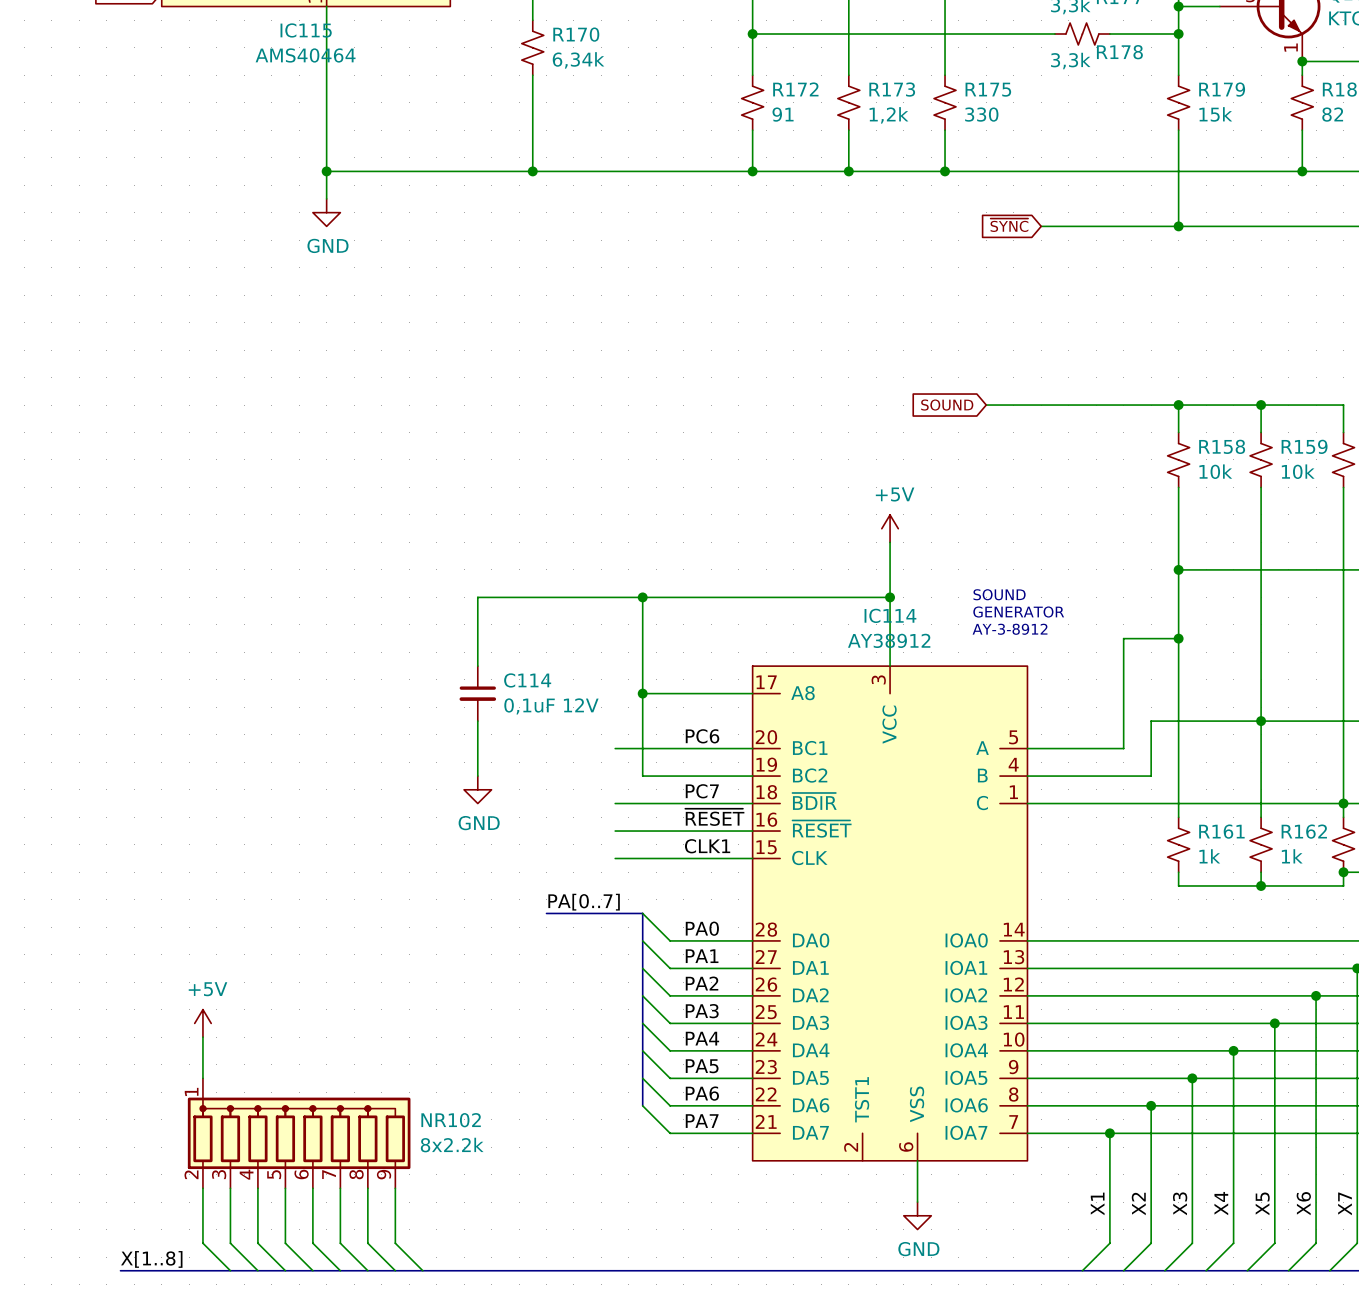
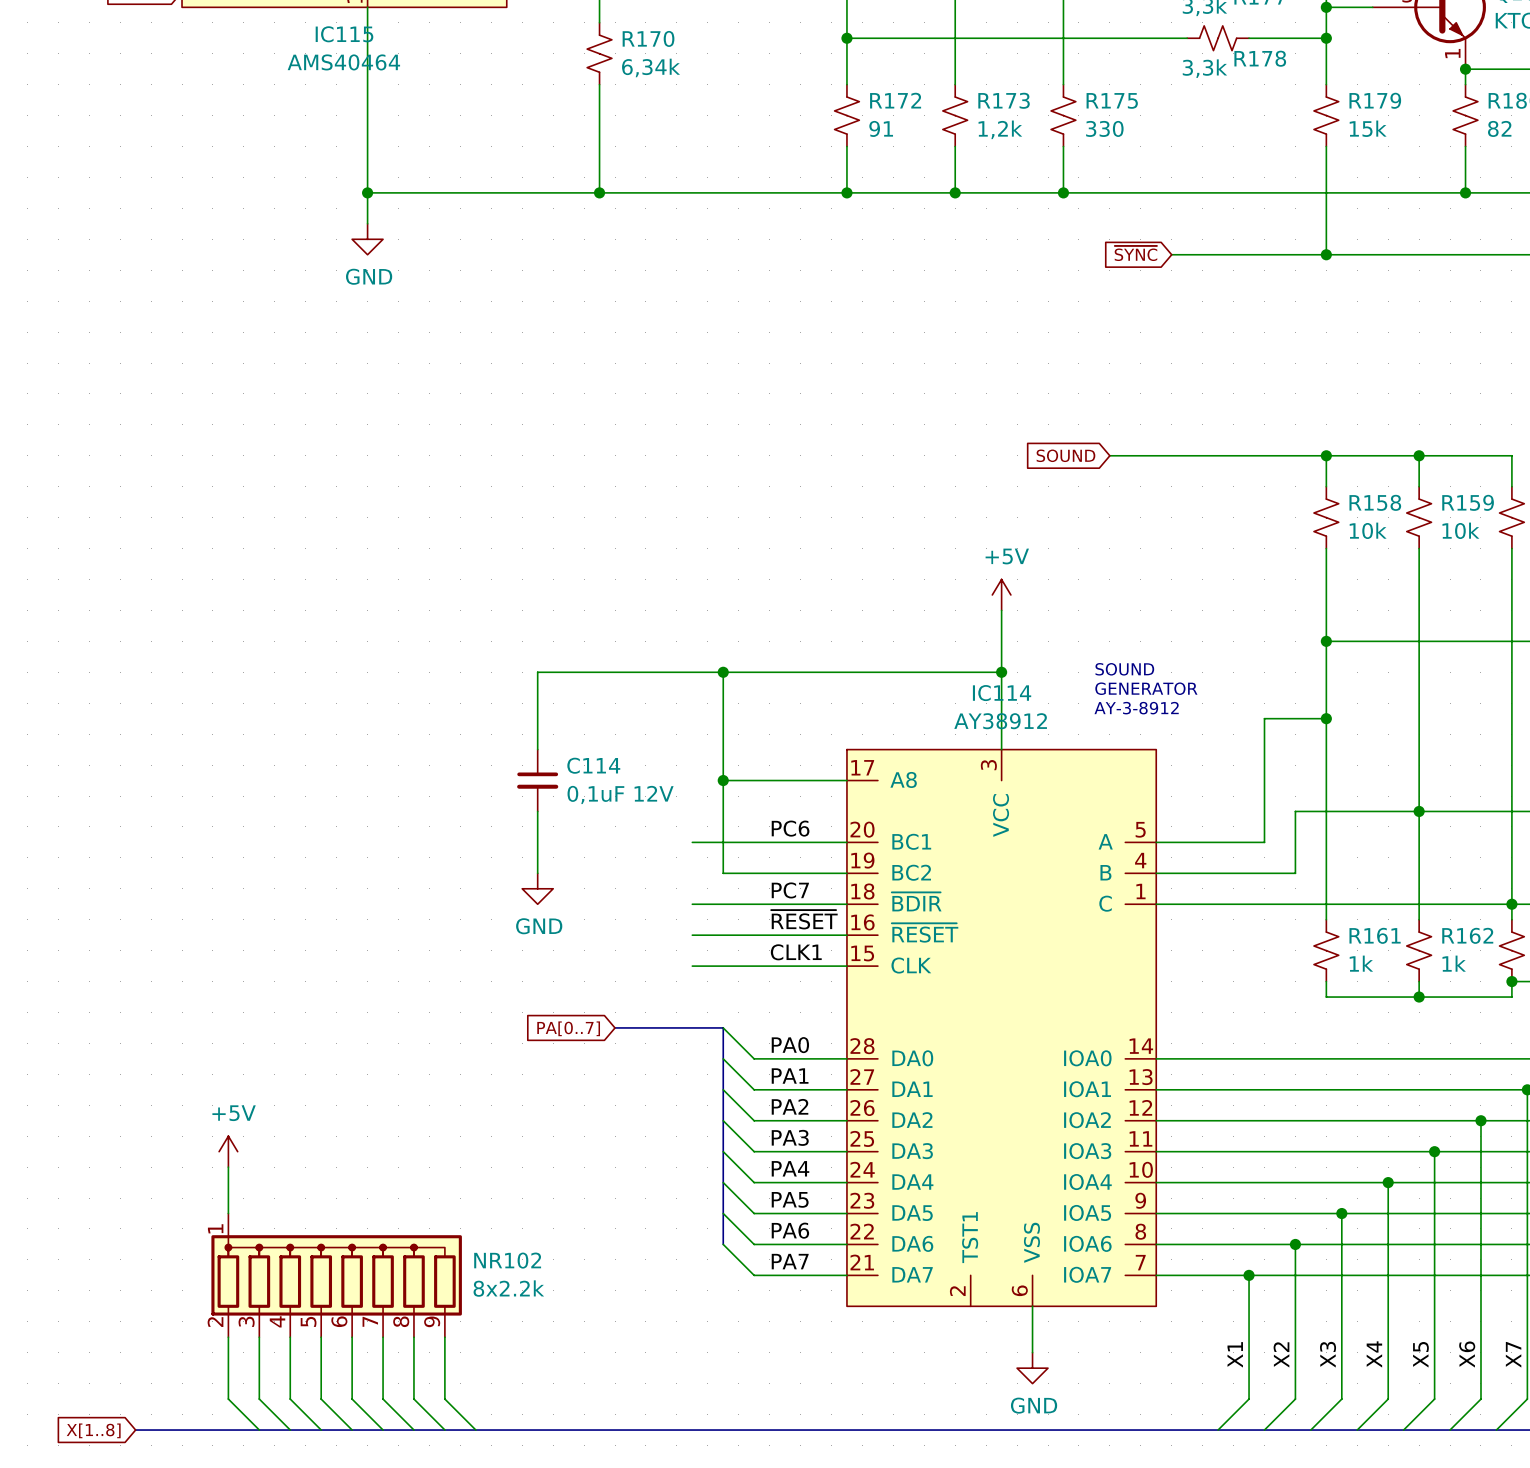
label: PA[0..7] (584, 902) -> none
global label: none -> PA[0..7] (568, 1028)
label: X[1..8] (151, 1259) -> none
global label: none -> X[1..8] (93, 1430)

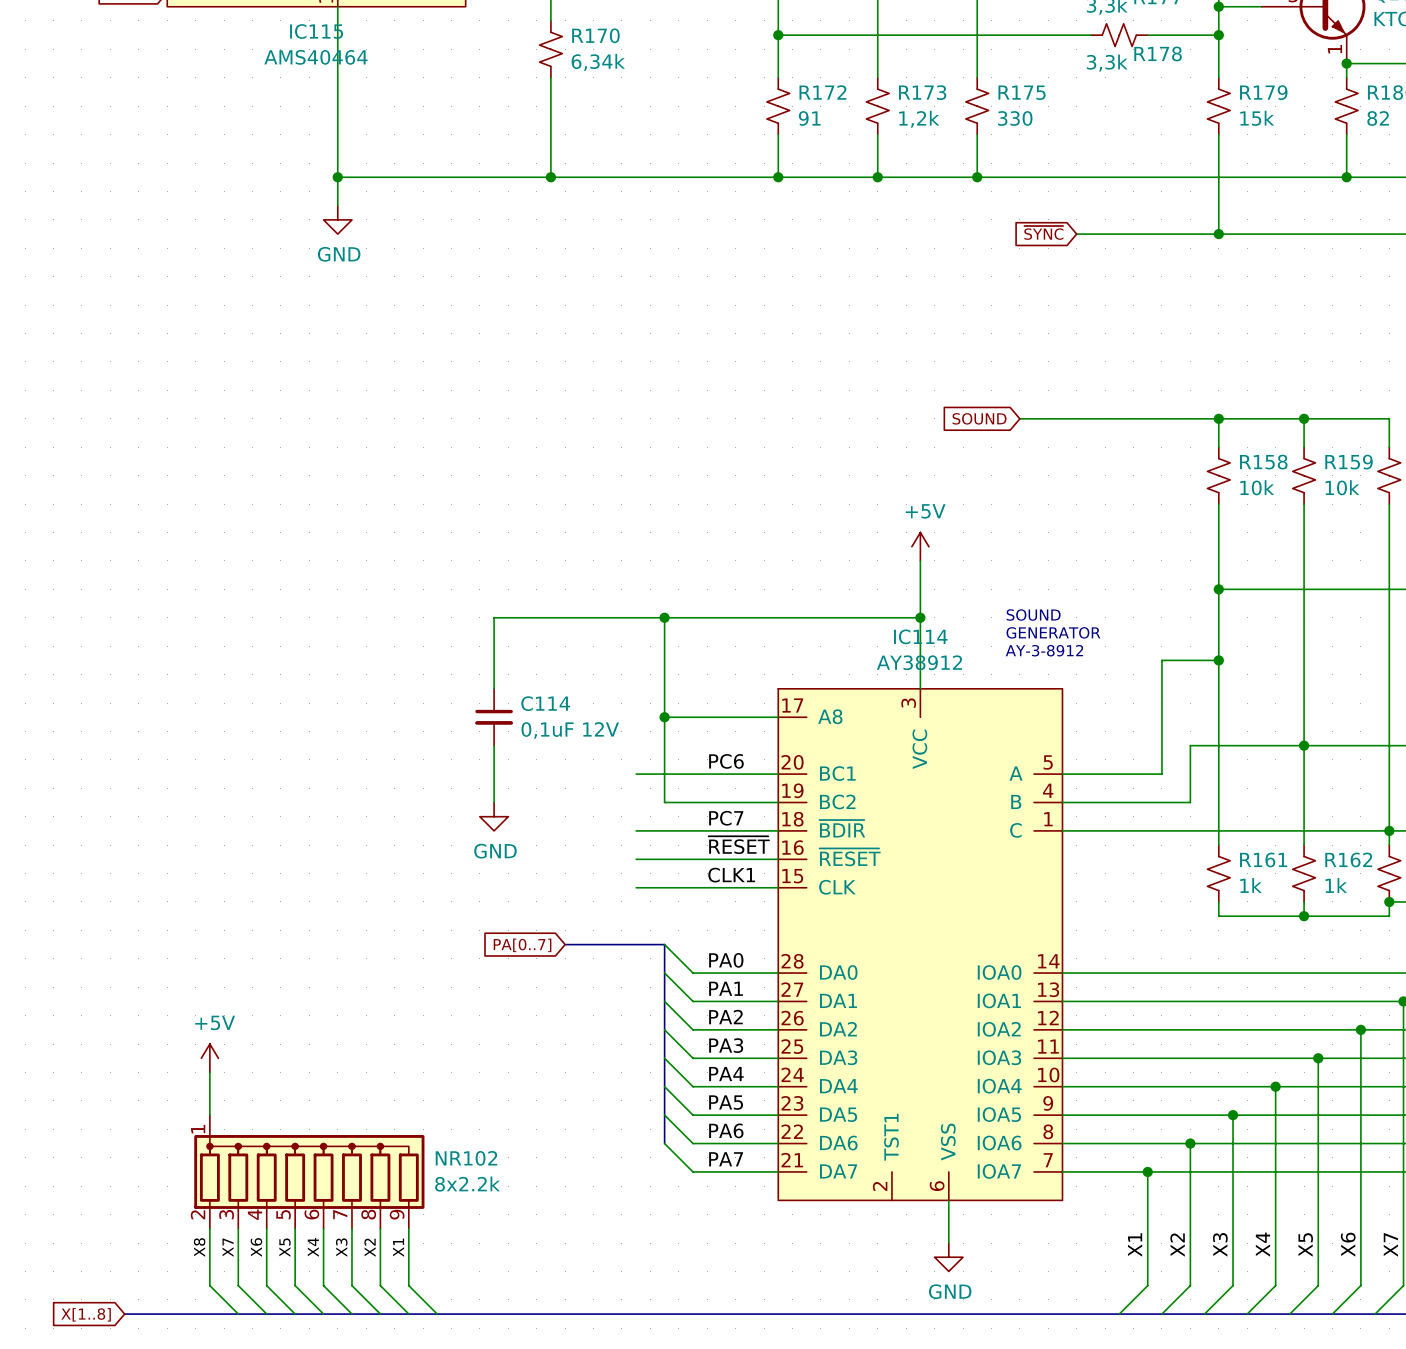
label: none -> X8 (199, 1247)
label: none -> X7 (228, 1247)
label: none -> X6 (256, 1247)
label: none -> X5 (284, 1247)
label: none -> X4 (313, 1247)
label: none -> X3 (341, 1247)
label: none -> X2 (370, 1247)
label: none -> X1 (398, 1247)

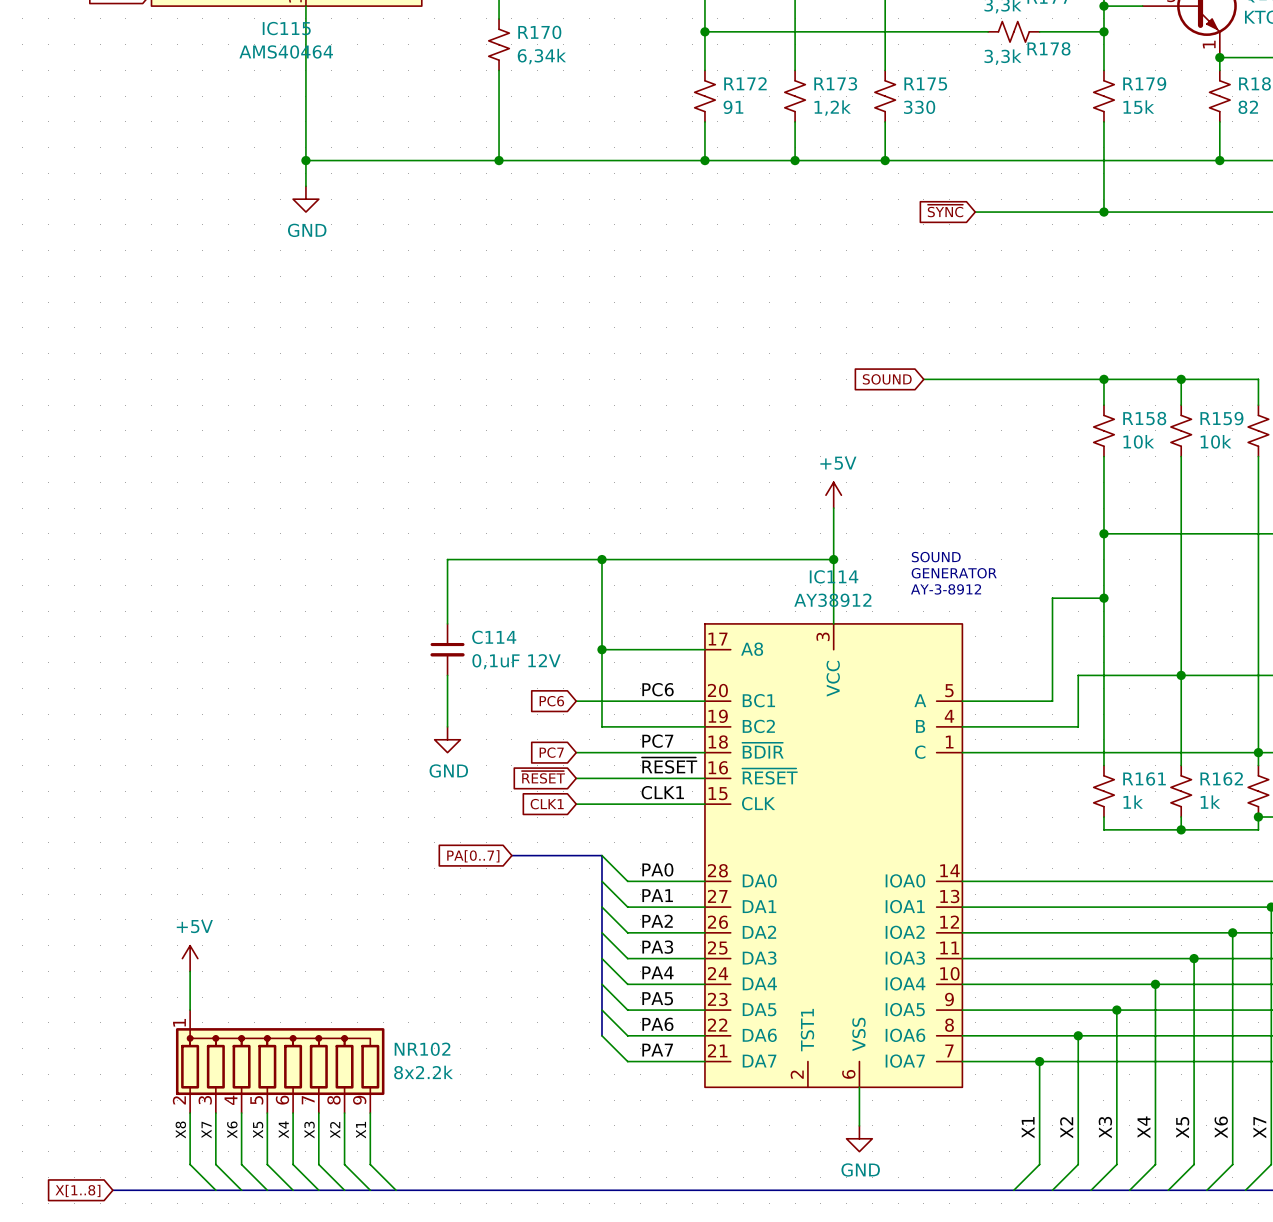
global label: none -> PC6 (551, 701)
global label: none -> PC7 (551, 752)
global label: none -> ~{RESET} (543, 777)
global label: none -> CLK1 (547, 804)

